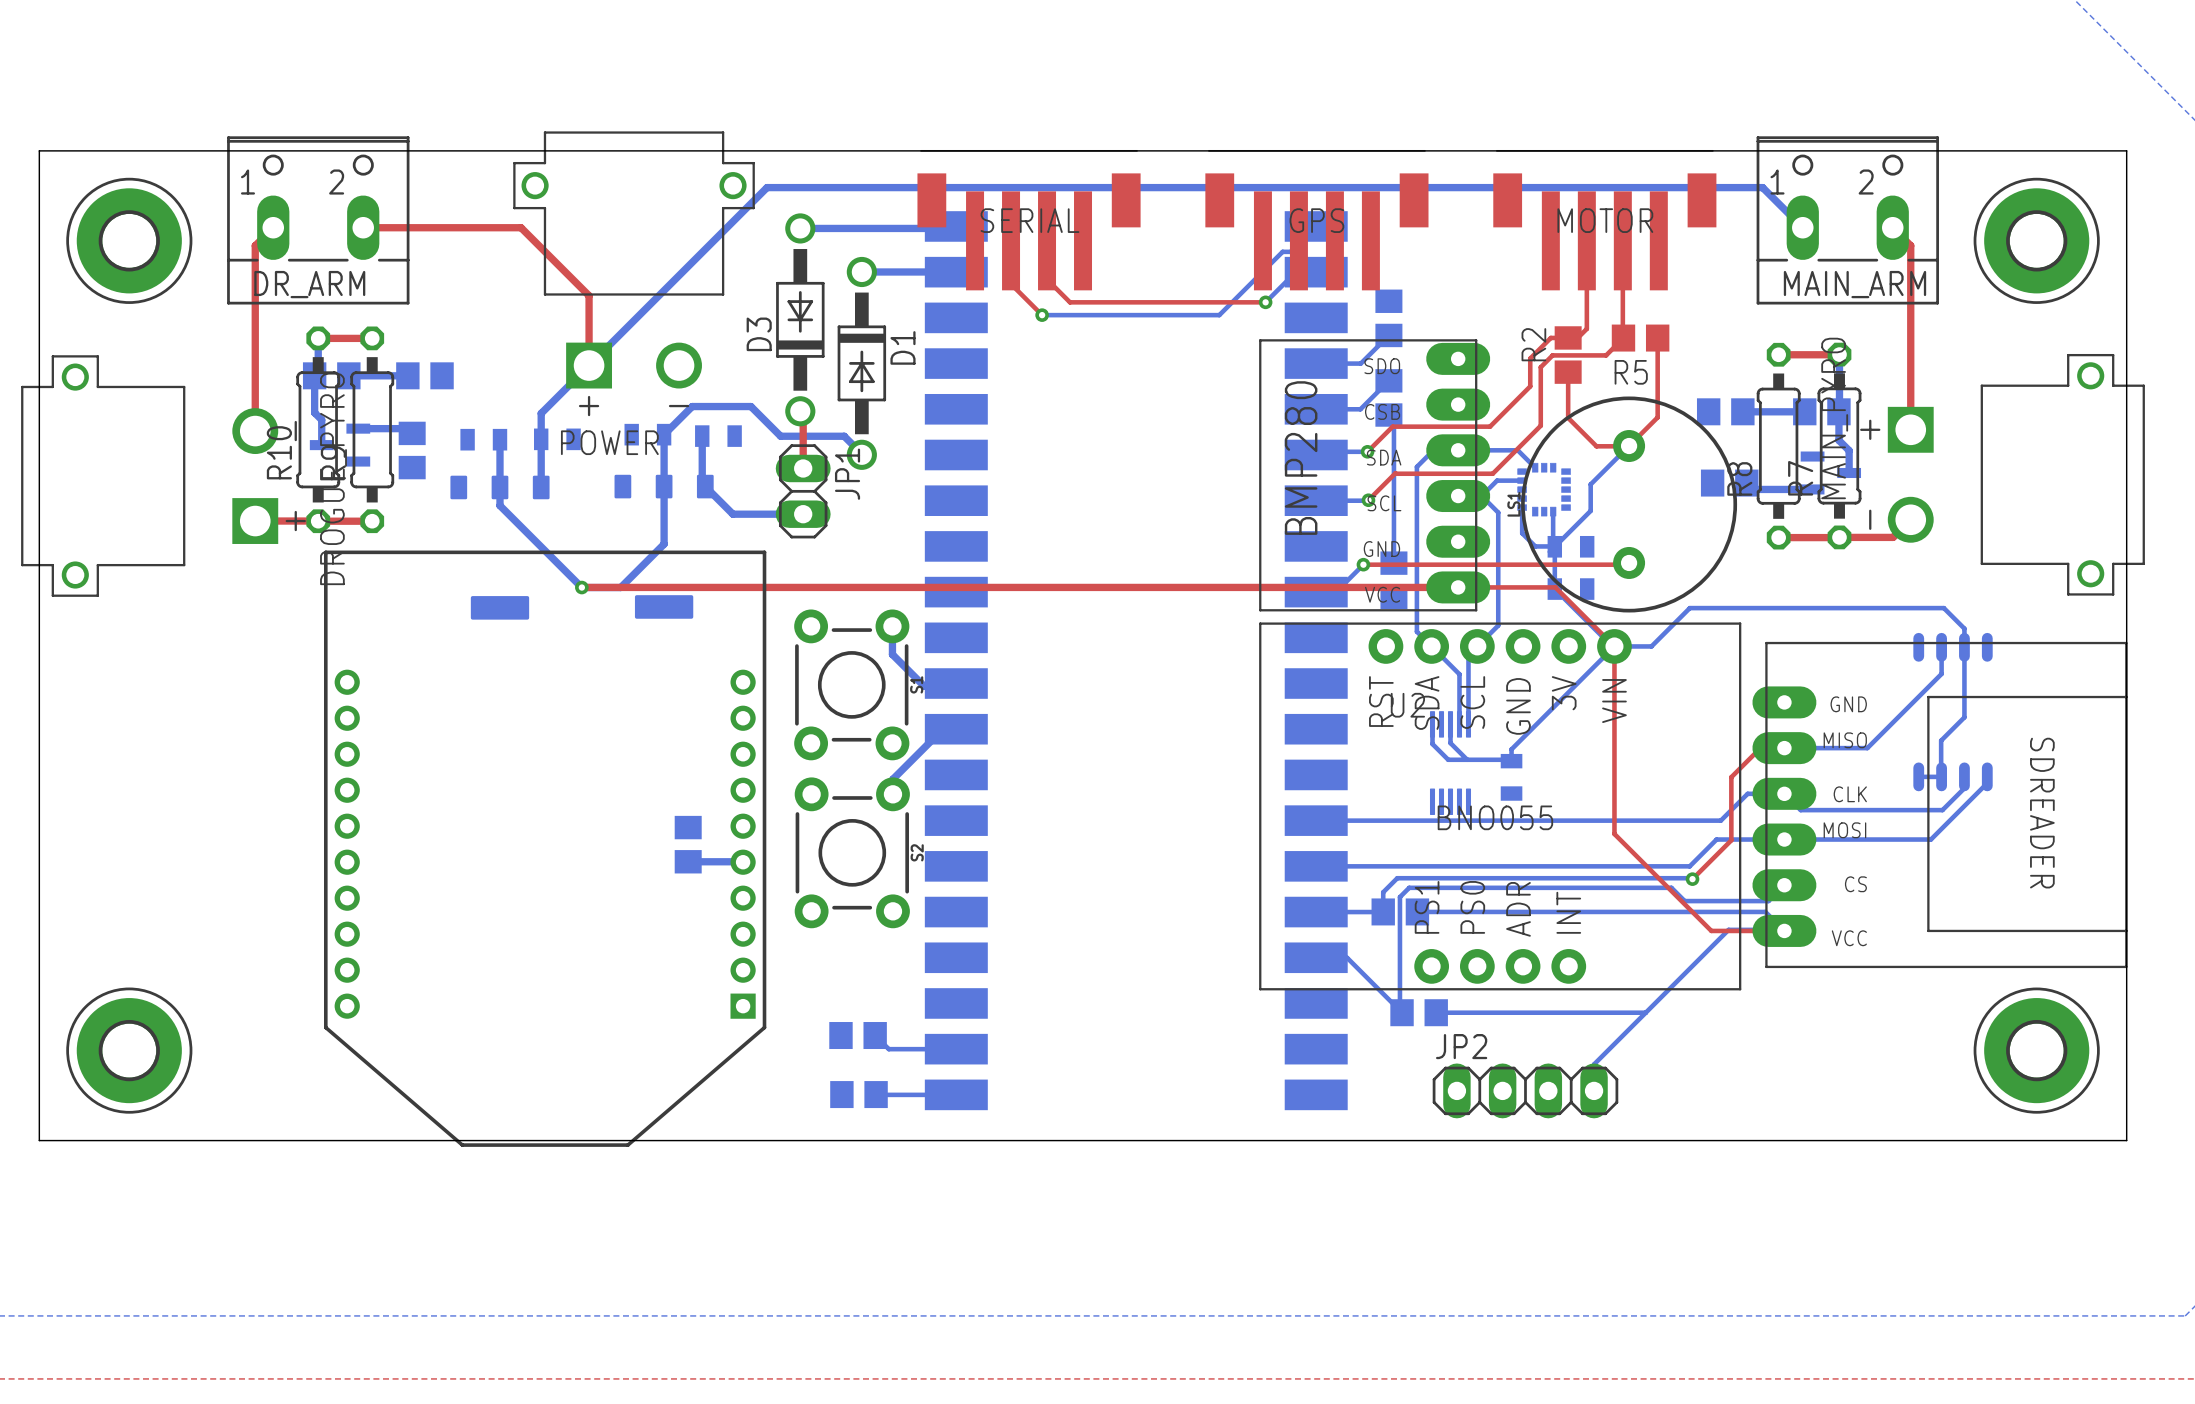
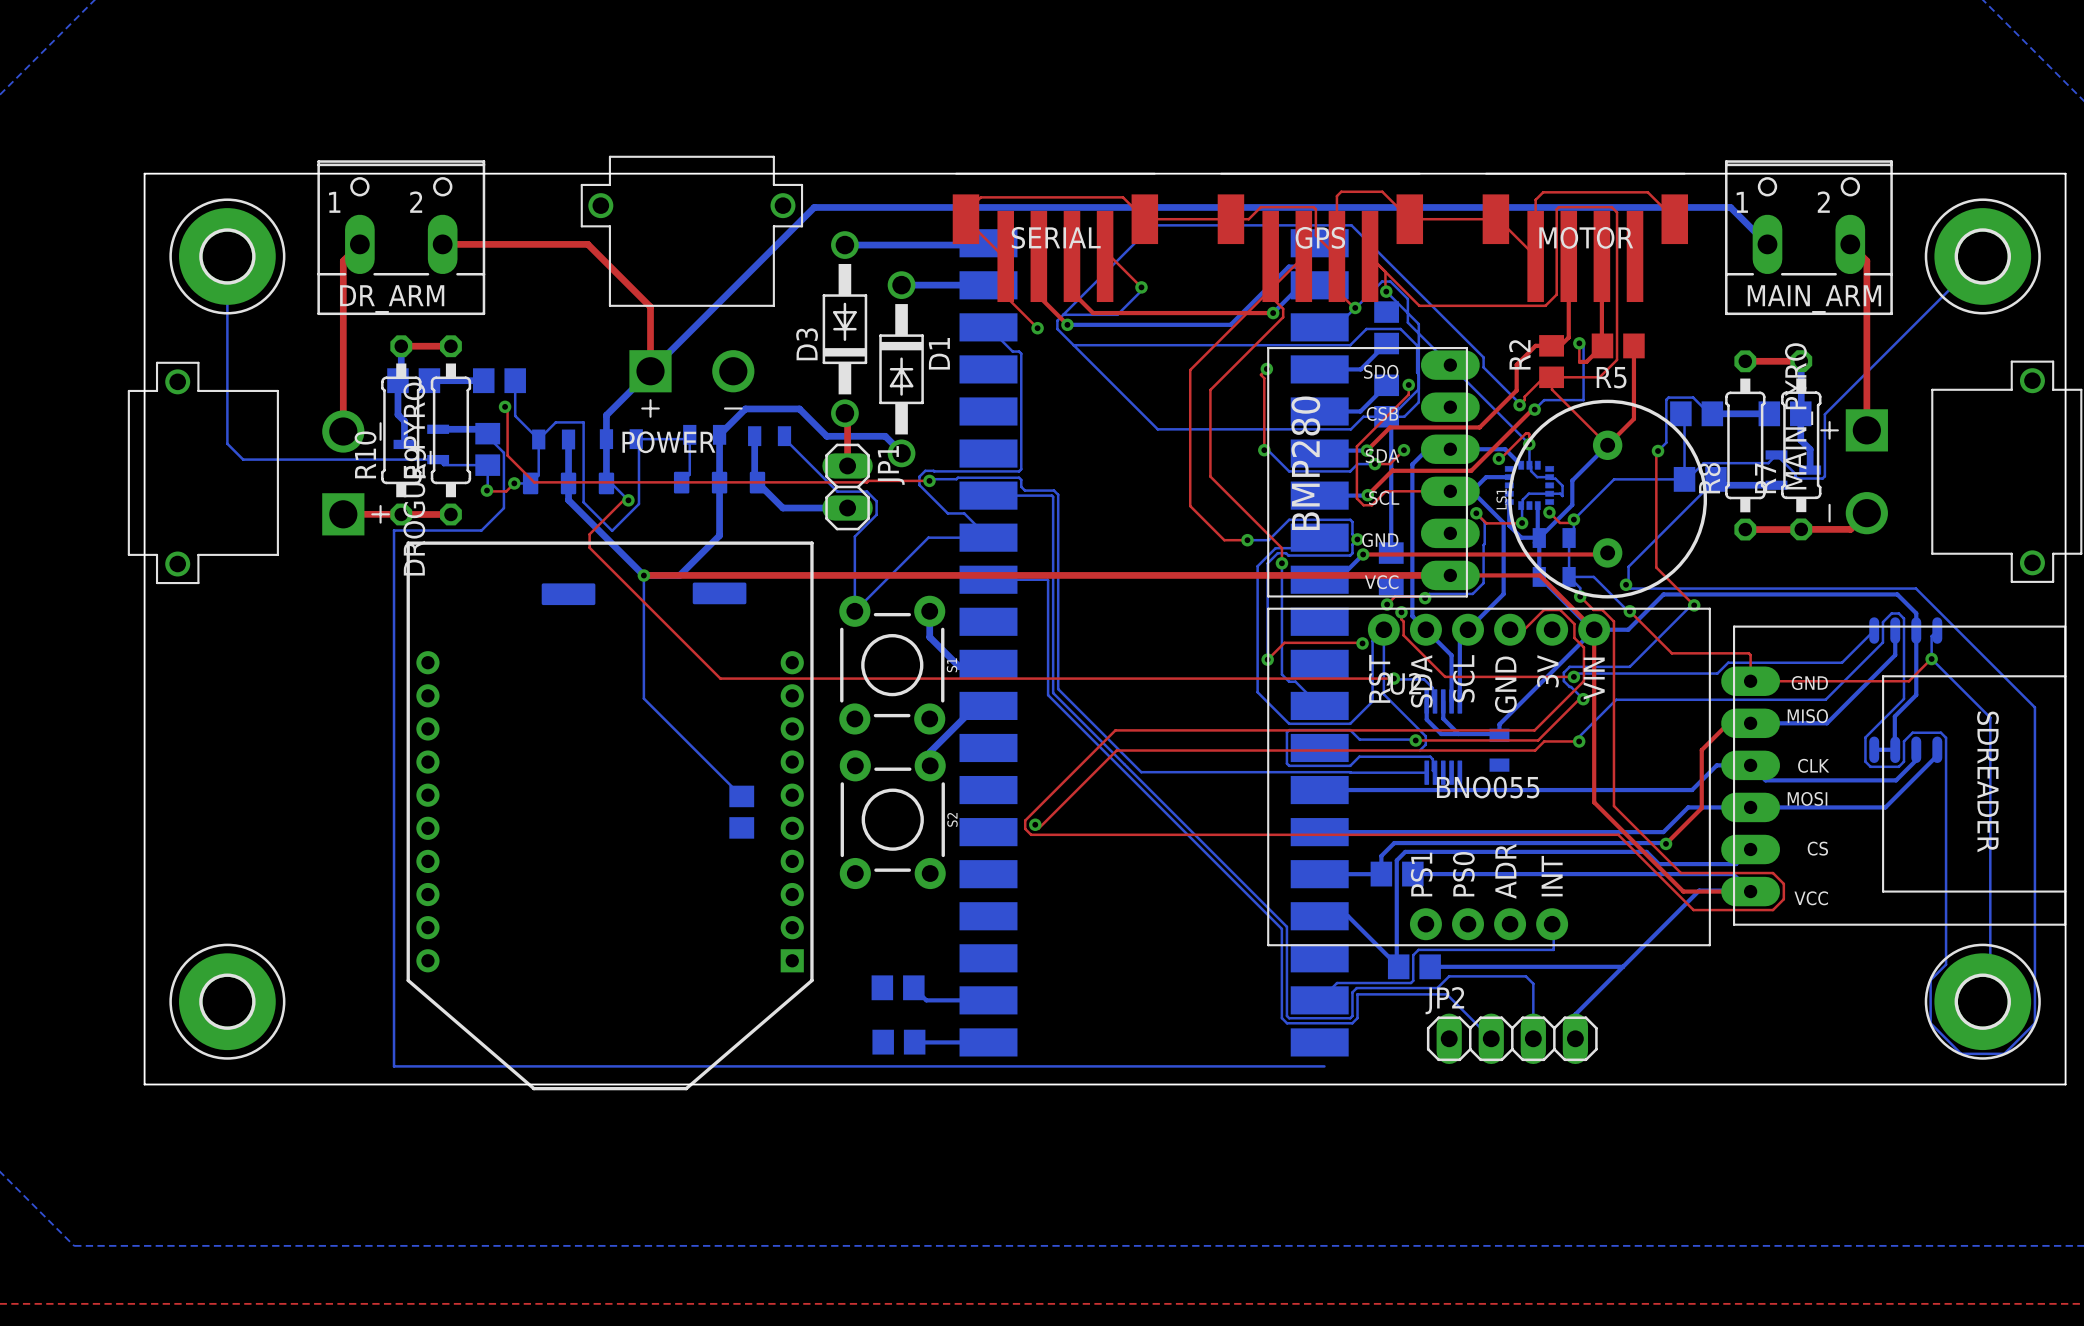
top track: none -> (1674, 219) (1647, 192) (1543, 192) (1535, 199) (1535, 256) (1498, 219) (1409, 219) (1382, 191) (1341, 191) (1336, 196) (1336, 290) (1355, 307)
bottom track: none -> (227, 256) (227, 443) (243, 459) (438, 459) (443, 465) (487, 465) (486, 490)
top track: none -> (1105, 256) (1110, 256) (1141, 287)
top track: none -> (1270, 256) (1270, 296) (1283, 308) (1283, 317) (1210, 389) (1210, 476) (1281, 548) (1281, 563)
top track: none -> (1303, 256) (1190, 370) (1190, 506) (1224, 540) (1247, 540)
top track: none -> (1336, 256) (1315, 235) (1315, 209) (1313, 207) (1260, 207) (1248, 219) (1144, 219) (1122, 197) (980, 197) (956, 221) (963, 221) (965, 219) (1003, 256) (1005, 256) (1005, 296) (1037, 328)
top track: none -> (1370, 256) (1419, 305) (1545, 305) (1556, 294) (1556, 209) (1558, 207) (1611, 207) (1617, 212) (1617, 359) (1599, 377) (1544, 377)
bottom track: none -> (1982, 256) (1824, 414) (1824, 476) (1822, 478) (1797, 478) (1776, 454) (1768, 463) (1703, 463) (1692, 474) (1684, 474)
top track: none -> (1385, 271) (1386, 291)
bottom track: none -> (1141, 287) (1142, 289) (1117, 314) (1063, 314)
via: none -> (1141, 287)
bottom track: none -> (1386, 291) (1418, 324) (1418, 402) (1404, 416) (1363, 416) (1350, 429) (1157, 429) (1057, 328) (1057, 320) (1152, 225) (1351, 225) (1483, 357) (1483, 367) (1519, 405)
via: none -> (1386, 291)
via: none -> (1355, 307)
bottom track: none -> (988, 327) (1012, 351) (1019, 351) (1021, 353) (1021, 469) (1019, 471) (925, 470) (919, 476) (919, 485) (947, 513) (964, 513) (988, 537) (928, 537) (854, 611) (854, 536) (876, 514) (876, 501) (866, 491) (837, 491) (784, 438) (784, 436)
bottom track: none -> (1319, 327) (1335, 327) (1382, 281) (1390, 281) (1407, 298) (1407, 322) (1529, 445)
via: none -> (1037, 328)
bottom track: none -> (1579, 343) (1583, 343) (1583, 400) (1544, 400) (1534, 409)
top track: none -> (1579, 343) (1579, 362)
via: none -> (1579, 343)
bottom track: none -> (1073, 345) (1350, 345) (1366, 328) (1400, 328) (1417, 345) (1417, 372) (1418, 374)
top track: (1599, 355) (1552, 355) (1540, 367) (1540, 425) (1492, 473) (1480, 473) -> (1534, 409) (1532, 409) (1471, 470)
top track: none -> (1266, 369) (1260, 374) (1264, 378) (1264, 450)
via: none -> (1266, 369)
top track: (1568, 372) (1568, 417) (1596, 446) (1629, 446) -> none
top track: none -> (1552, 379) (1541, 379) (1524, 396) (1524, 400) (1519, 405)
bottom track: none -> (515, 380) (515, 415) (538, 439)
top track: none -> (1551, 379) (1551, 377) (1551, 389) (1607, 445) (1605, 445)
top track: none -> (1408, 384) (1408, 394) (1356, 446) (1356, 498) (1363, 505) (1371, 505) (1385, 491) (1450, 491)
via: none -> (1408, 384)
bottom track: none -> (1418, 389) (1391, 416)
via: none -> (1519, 405)
top track: none -> (505, 406) (507, 406) (507, 455) (534, 482) (929, 480)
via: none -> (505, 406)
via: none -> (1534, 409)
bottom track: none -> (1680, 413) (1684, 417) (1684, 479) (1614, 479) (1573, 519) (1573, 533) (1569, 538) (1569, 576)
bottom track: none -> (1712, 413) (1709, 413) (1693, 397) (1668, 397) (1666, 399) (1666, 442) (1658, 451)
bottom track: none -> (487, 433) (487, 436) (503, 452) (503, 508) (481, 530) (394, 530) (394, 1066) (1324, 1066)
bottom track: none -> (538, 439) (555, 422) (583, 422) (583, 502) (612, 530) (638, 504) (638, 441) (636, 439) (685, 439) (689, 434) (689, 474) (681, 482)
bottom track: none -> (538, 439) (538, 475) (530, 483) (514, 483)
top track: none -> (1529, 444) (1529, 434) (1526, 433) (1498, 458)
via: none -> (1529, 444)
bottom track: none -> (1529, 446) (1531, 471) (1537, 477) (1555, 478) (1562, 485) (1562, 496) (1560, 493) (1528, 493) (1522, 499) (1521, 505) (1522, 523)
bottom track: none -> (1264, 450) (1268, 451) (1289, 471) (1350, 471) (1357, 464) (1374, 464)
via: none -> (1264, 450)
top track: none -> (1403, 450) (1390, 464) (1374, 464)
via: none -> (1403, 450)
top track: none -> (1658, 451) (1656, 451) (1656, 567) (1694, 605)
via: none -> (1658, 451)
via: none -> (1498, 458)
via: none -> (1374, 464)
bottom track: none -> (606, 478) (628, 500)
bottom track: none -> (1715, 479) (1628, 566) (1628, 582) (1626, 584) (1629, 588) (1915, 588) (2034, 707) (2034, 1023) (2004, 1053) (1961, 1053) (1930, 1023) (1930, 980) (1946, 964) (1946, 737) (1940, 732) (1912, 732) (1904, 741) (1904, 761) (1898, 766) (1870, 766) (1865, 761) (1865, 737) (1904, 698) (1904, 618) (1898, 613) (1891, 613) (1882, 622) (1882, 642) (1825, 699) (1616, 699) (1576, 739) (1579, 741)
bottom track: none -> (929, 480) (929, 479) (957, 477) (1019, 477) (1021, 479) (1021, 486) (1024, 490) (1053, 490) (1058, 494) (1058, 689) (1141, 772) (1426, 772)
via: none -> (929, 480)
top track: none -> (514, 483) (506, 491) (486, 490)
via: none -> (514, 483)
via: none -> (486, 490)
bottom track: none -> (988, 495) (1053, 496) (1053, 693) (1286, 926) (1286, 1016) (1289, 1018) (1350, 1018) (1352, 1016) (1352, 992) (1356, 988) (1437, 988) (1449, 976) (1525, 976) (1533, 983) (1533, 1038)
top track: none -> (628, 500) (624, 498) (589, 534) (589, 547) (720, 678) (1393, 678)
via: none -> (628, 500)
bottom track: (1498, 512) (1498, 625) -> (1487, 506) (1503, 522) (1503, 594) (1487, 610)
bottom track: none -> (1476, 513) (1484, 522) (1483, 583) (1472, 593) (1429, 593) (1425, 598)
top track: none -> (1476, 513) (1486, 523) (1522, 523)
via: none -> (1476, 513)
top track: none -> (1549, 512) (1559, 522) (1571, 522) (1573, 519)
via: none -> (1549, 512)
via: none -> (1573, 519)
via: none -> (1522, 523)
bottom track: none -> (1319, 537) (1309, 548) (1275, 548) (1257, 566) (1257, 692) (1289, 723) (1350, 723) (1372, 701) (1372, 641) (1383, 629) (1383, 694) (1425, 736) (1425, 744) (1419, 750)
via: none -> (1357, 539)
bottom track: none -> (1247, 540) (1268, 540) (1289, 519) (1350, 519) (1352, 522) (1352, 534) (1357, 539) (1352, 544) (1352, 553) (1350, 555) (1288, 555) (1286, 553) (1277, 553) (1267, 563) (1267, 659)
via: none -> (1247, 540)
bottom track: none -> (1281, 563) (1281, 674) (1289, 681) (1295, 681) (1319, 705)
via: none -> (1281, 563)
bottom track: none -> (643, 575) (643, 698) (741, 796)
bottom track: none -> (1569, 576) (1593, 576) (1629, 611)
bottom track: none -> (1569, 576) (1580, 588) (1580, 596)
bottom track: none -> (988, 579) (1048, 580) (1048, 695) (1281, 928) (1281, 1018) (1287, 1023) (1352, 1023) (1357, 1018) (1357, 994)
via: none -> (1626, 584)
top track: none -> (1580, 596) (1593, 609) (1602, 609) (1613, 621) (1613, 806) (1680, 873) (1772, 873) (1783, 883) (1783, 899) (1772, 910) (1693, 910) (1618, 834) (1031, 834) (1025, 828) (1025, 820) (1115, 730) (1534, 730) (1583, 681) (1583, 647) (1574, 637) (1574, 624) (1560, 609) (1543, 609) (1524, 629) (1510, 629)
via: none -> (1580, 596)
top track: none -> (1425, 598) (1425, 596) (1395, 596) (1387, 604)
via: none -> (1425, 598)
via: none -> (1387, 604)
bottom track: none -> (1694, 605) (1692, 604) (1629, 666) (1569, 666) (1563, 672) (1563, 681) (1583, 699)
via: none -> (1694, 605)
top track: none -> (1629, 611) (1671, 653) (1748, 653) (1750, 655) (1750, 681) (1908, 681) (1931, 658)
via: none -> (1629, 611)
top track: none -> (1401, 612) (1403, 635) (1445, 676) (1573, 676)
via: none -> (1401, 612)
bottom track: none -> (1874, 630) (1842, 662) (1728, 662) (1717, 673) (1575, 673) (1573, 676)
bottom track: none -> (1937, 630) (1931, 636) (1931, 659) (1990, 717) (1990, 1012) (1982, 1005) (1982, 1001)
top track: none -> (1362, 643) (1284, 642) (1267, 659)
via: none -> (1362, 643)
via: none -> (1267, 659)
via: none -> (1931, 659)
via: none -> (1573, 676)
bottom track: none -> (1393, 678) (1424, 679) (1432, 688) (1432, 699) (1435, 701)
via: none -> (1393, 678)
top track: none -> (1583, 699) (1579, 699) (1538, 740) (1415, 740)
via: none -> (1583, 699)
bottom track: none -> (1415, 740) (1359, 739) (1350, 730) (1289, 730) (1286, 732) (1286, 763) (1289, 765) (1350, 765) (1359, 756) (1430, 756) (1432, 759) (1432, 770) (1435, 772)
via: none -> (1415, 740)
top track: none -> (1579, 741) (1544, 741) (1535, 750) (1116, 750) (1038, 828) (1035, 824)
via: none -> (1579, 741)
via: none -> (1035, 824)
bottom track: (688, 861) (742, 861) -> none
bottom track: none -> (1552, 924) (1553, 949) (1418, 949) (1413, 955) (1413, 980) (1411, 983) (1337, 983) (1319, 1000)
bottom track: none -> (1357, 994) (1446, 994) (1491, 1038)

